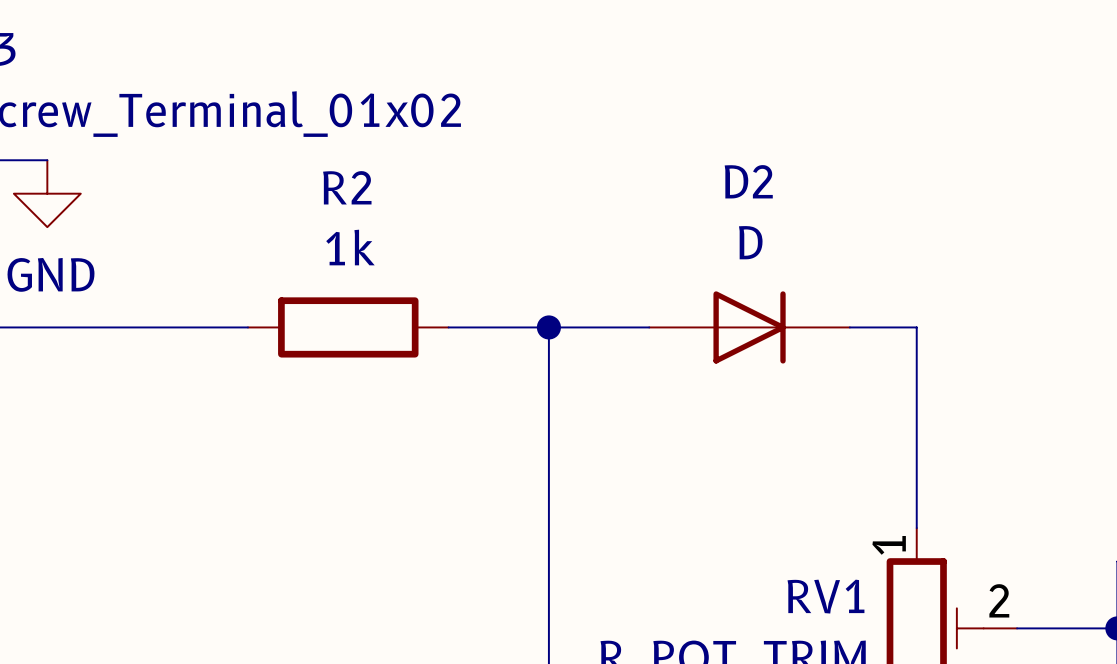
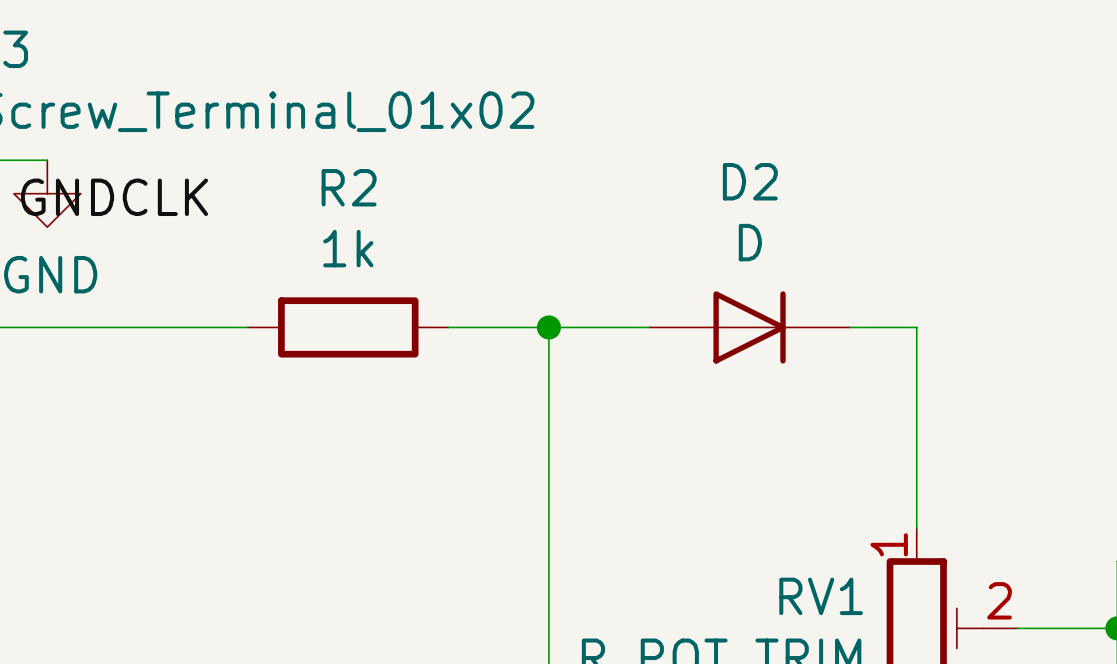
label: none -> GNDCLK (114, 197)

